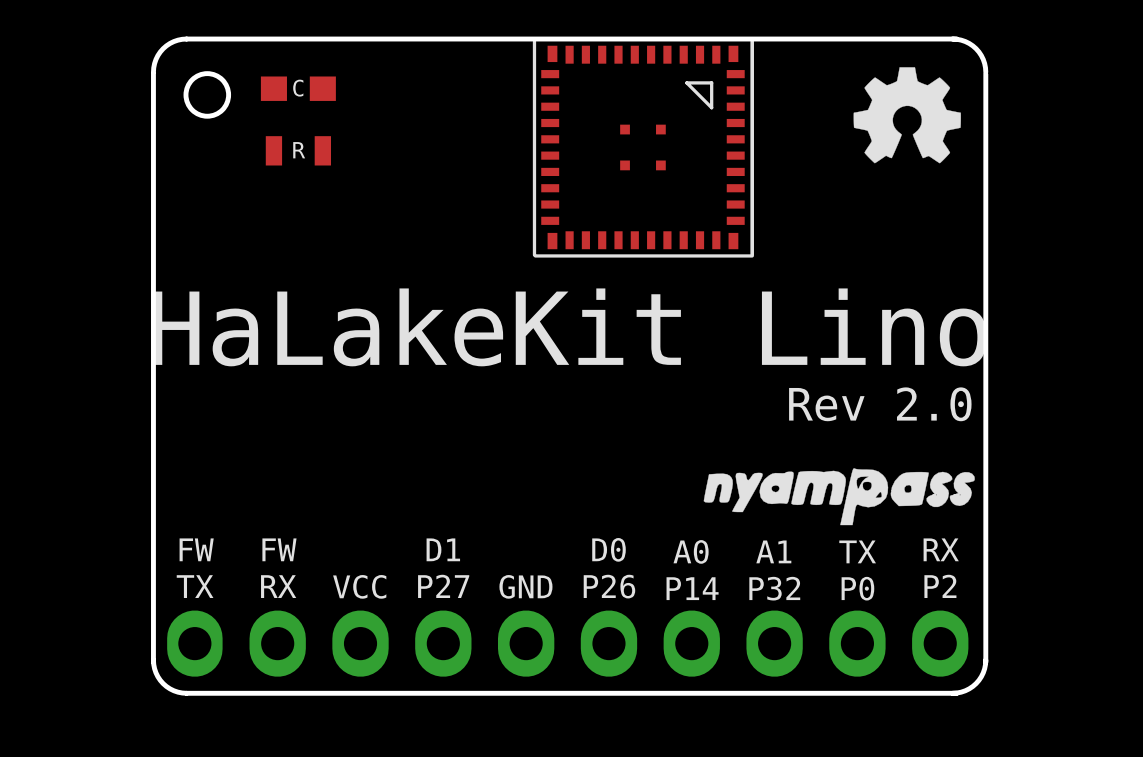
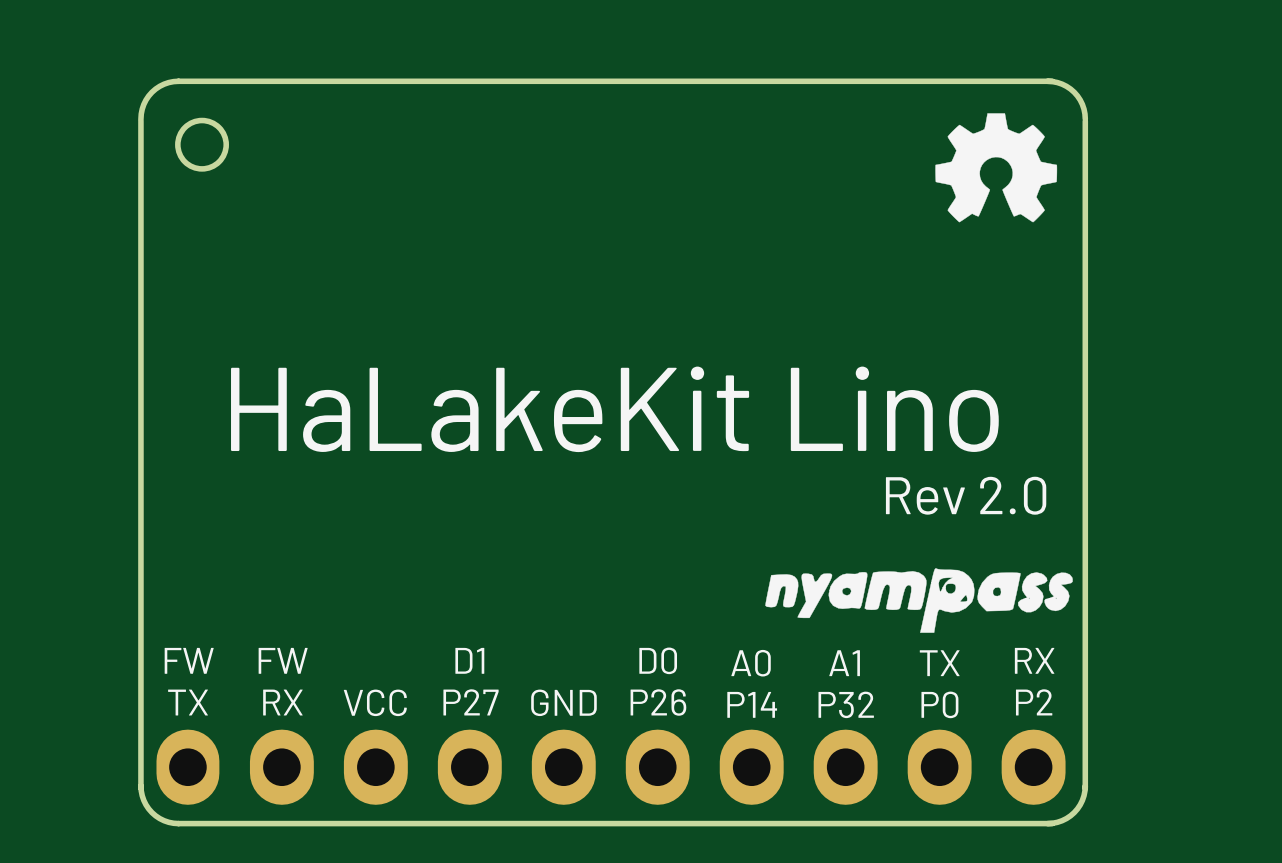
C: (298, 88) -> none
part: (643, 148) -> none
R: (298, 150) -> none

